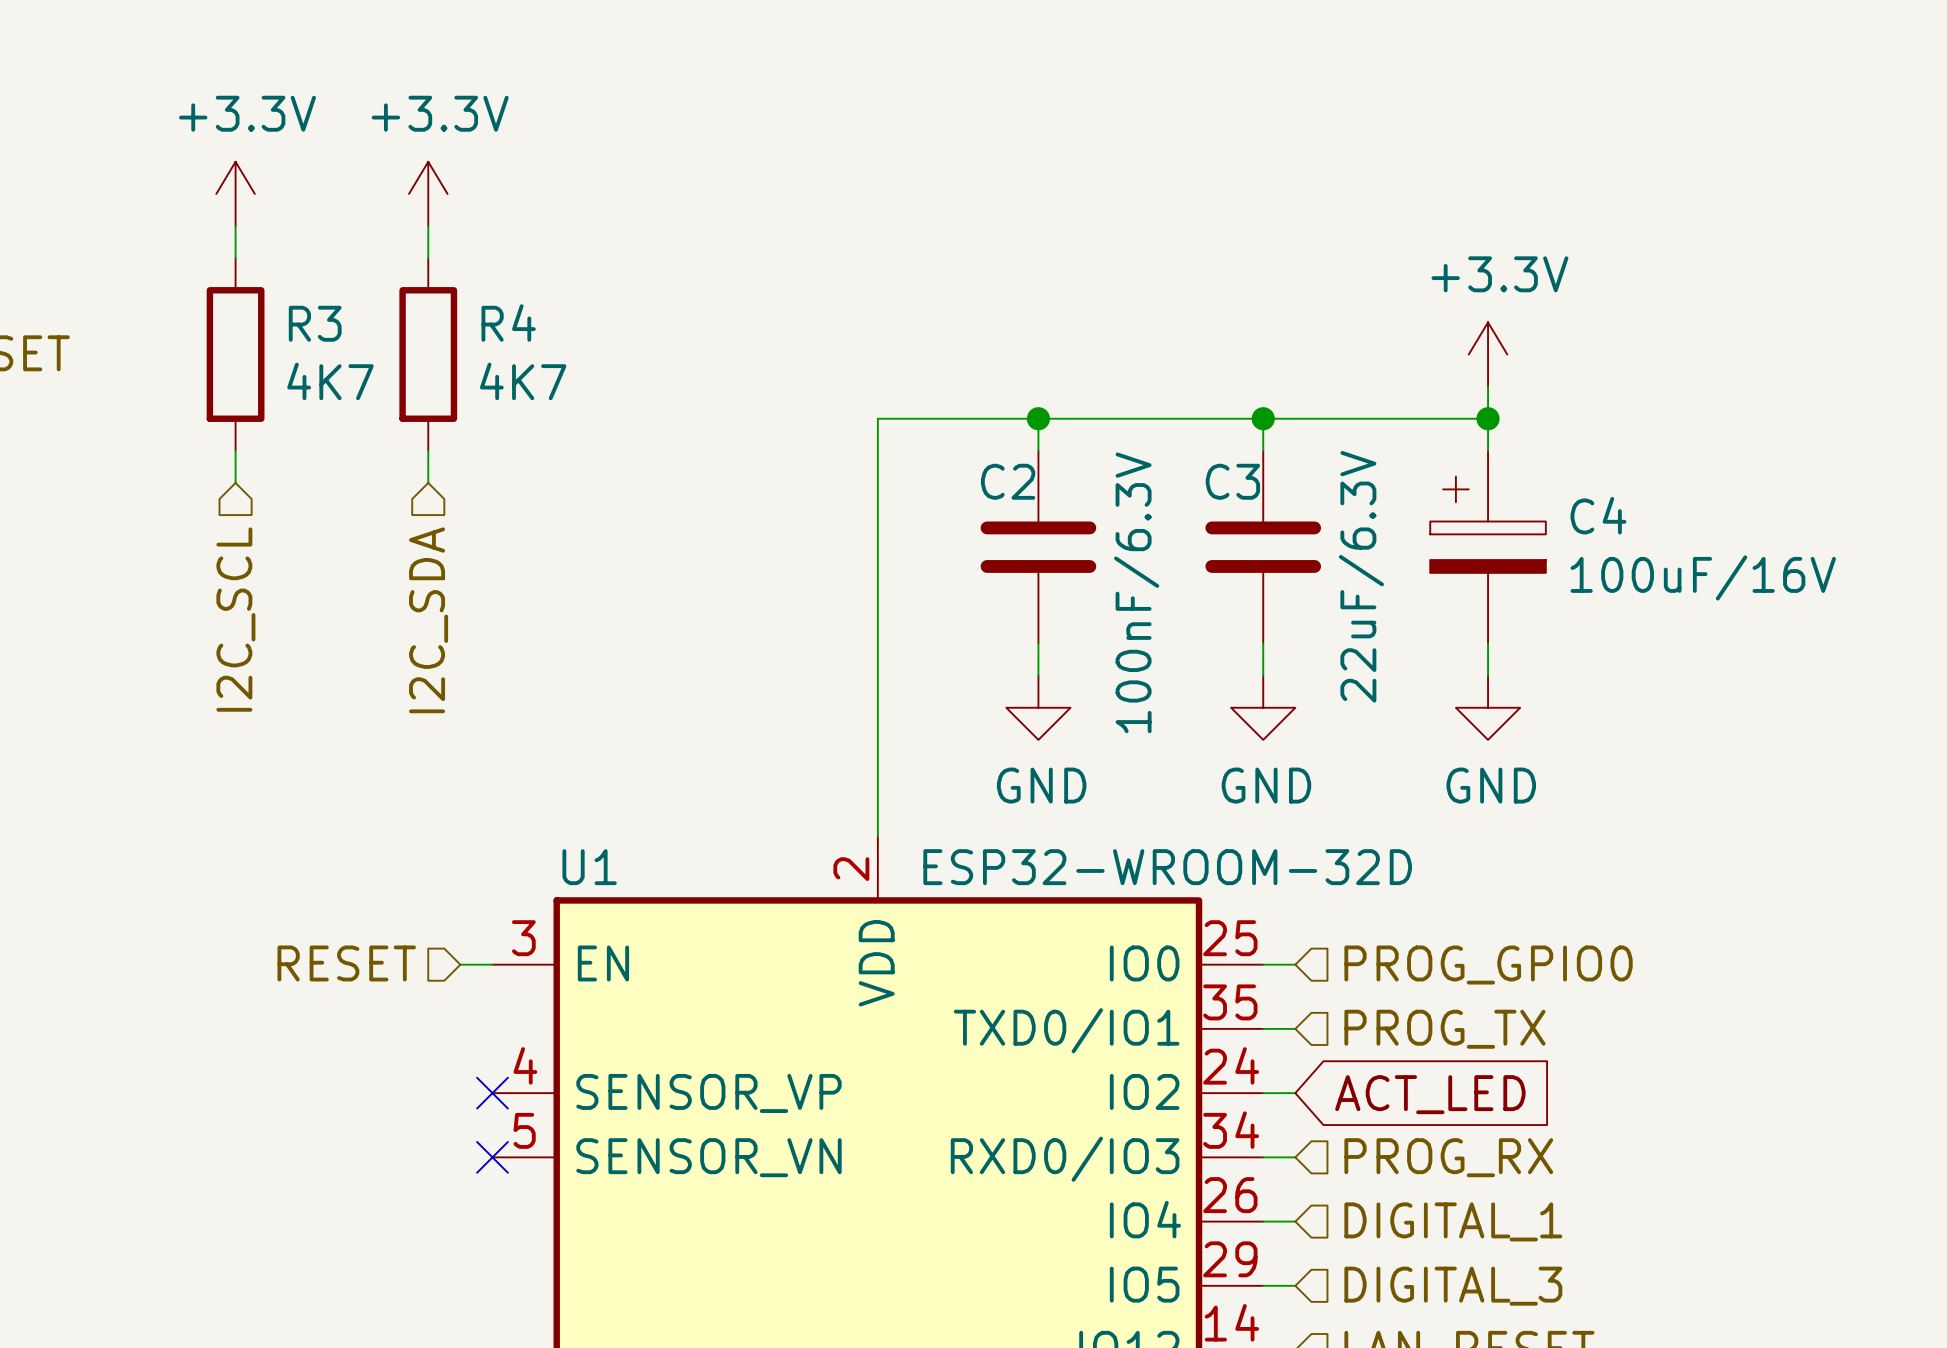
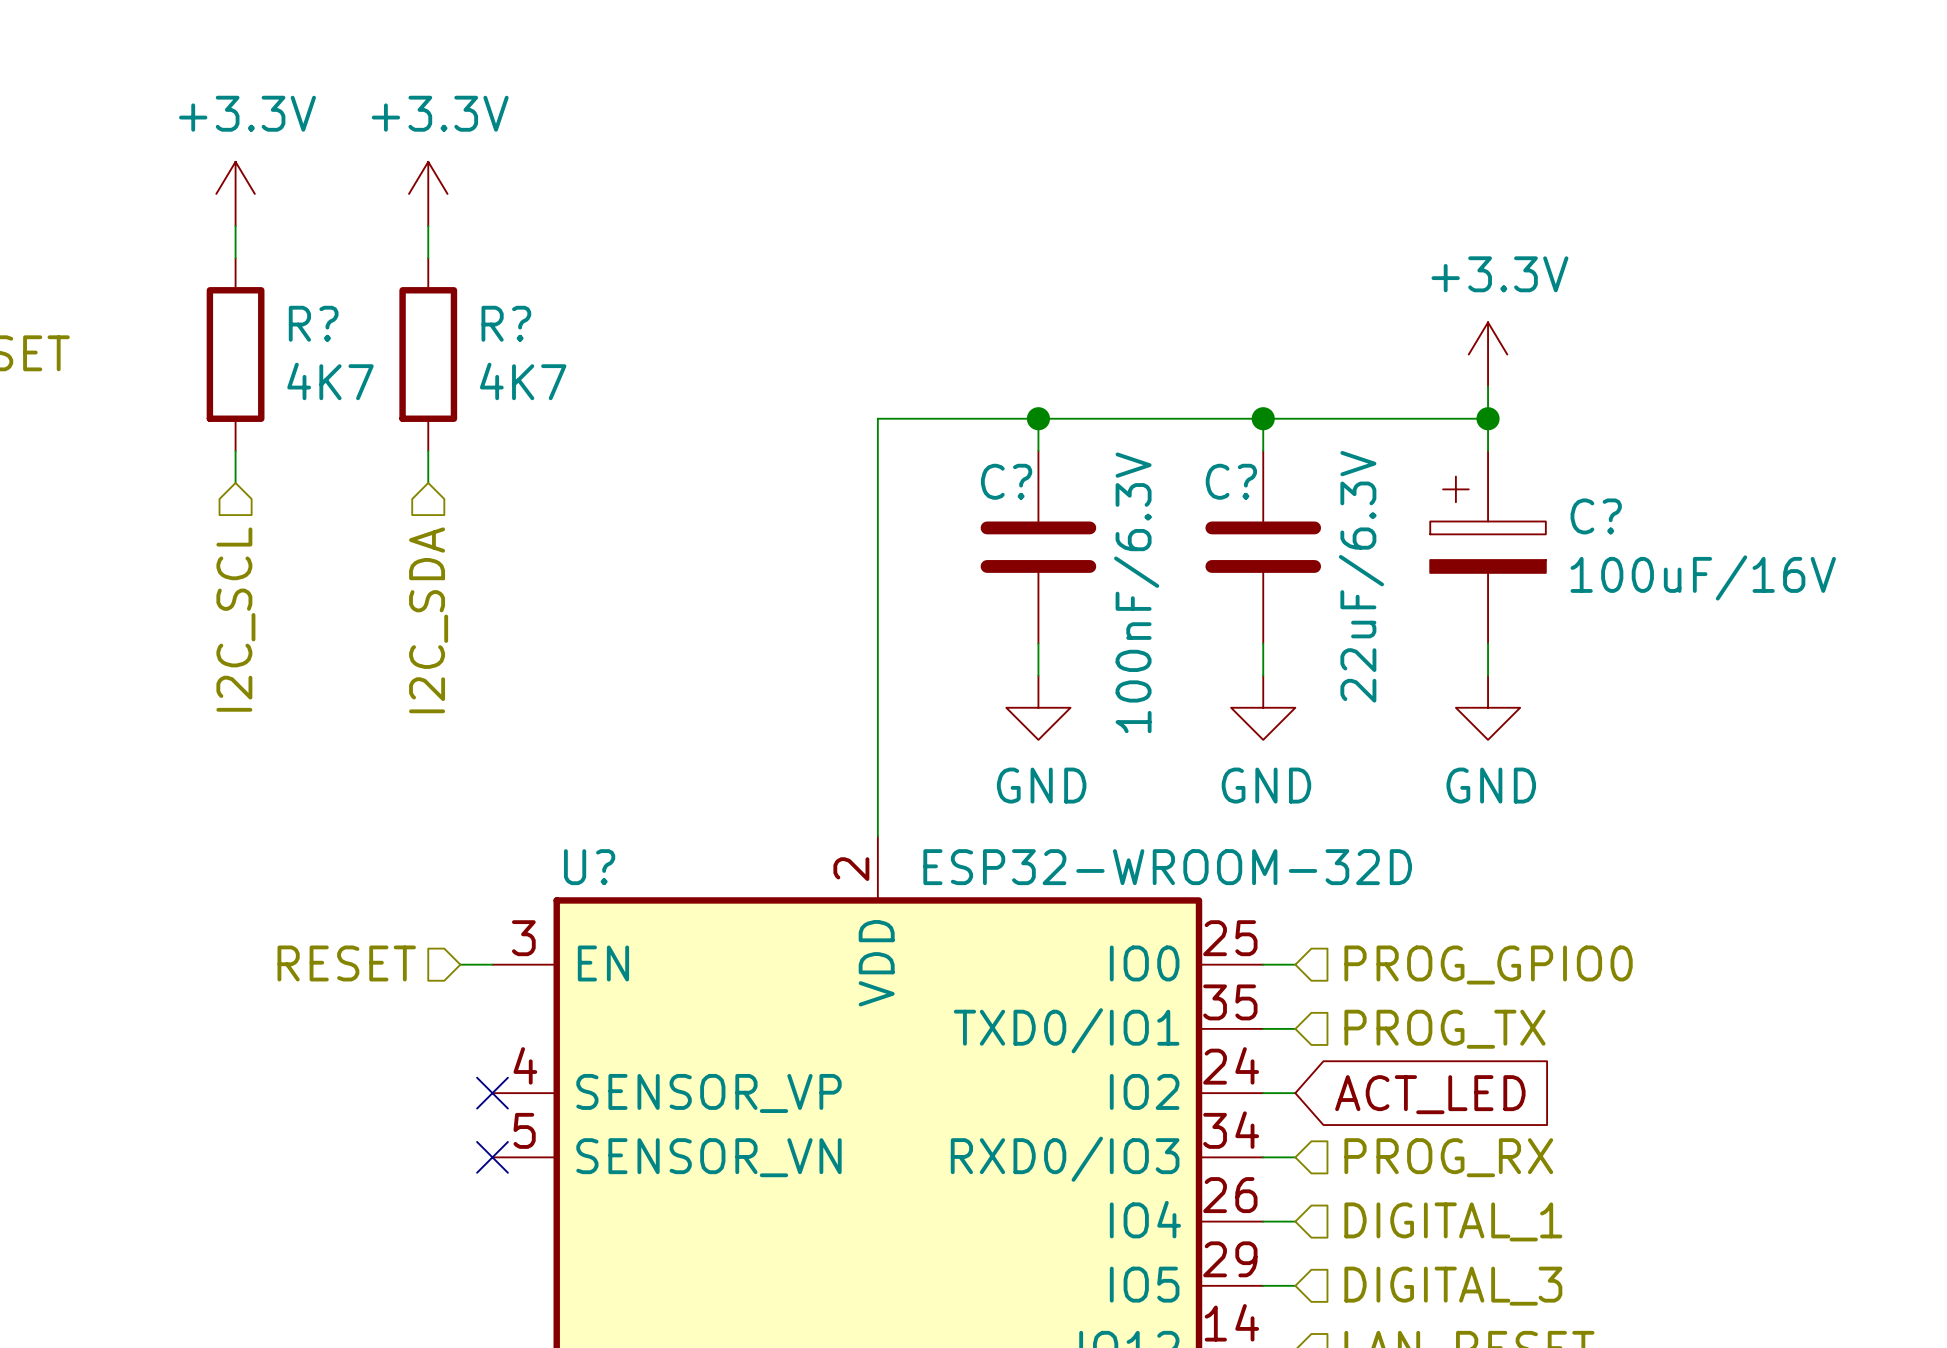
R3 name: R3 (315, 323) -> R? (313, 323)
R4 name: R4 (508, 323) -> R? (506, 323)
C2 name: C2 (1008, 481) -> C? (1006, 481)
C3 name: C3 (1232, 481) -> C? (1231, 481)
C4 name: C4 (1598, 515) -> C? (1596, 516)
U1 name: U1 (589, 867) -> U? (589, 867)

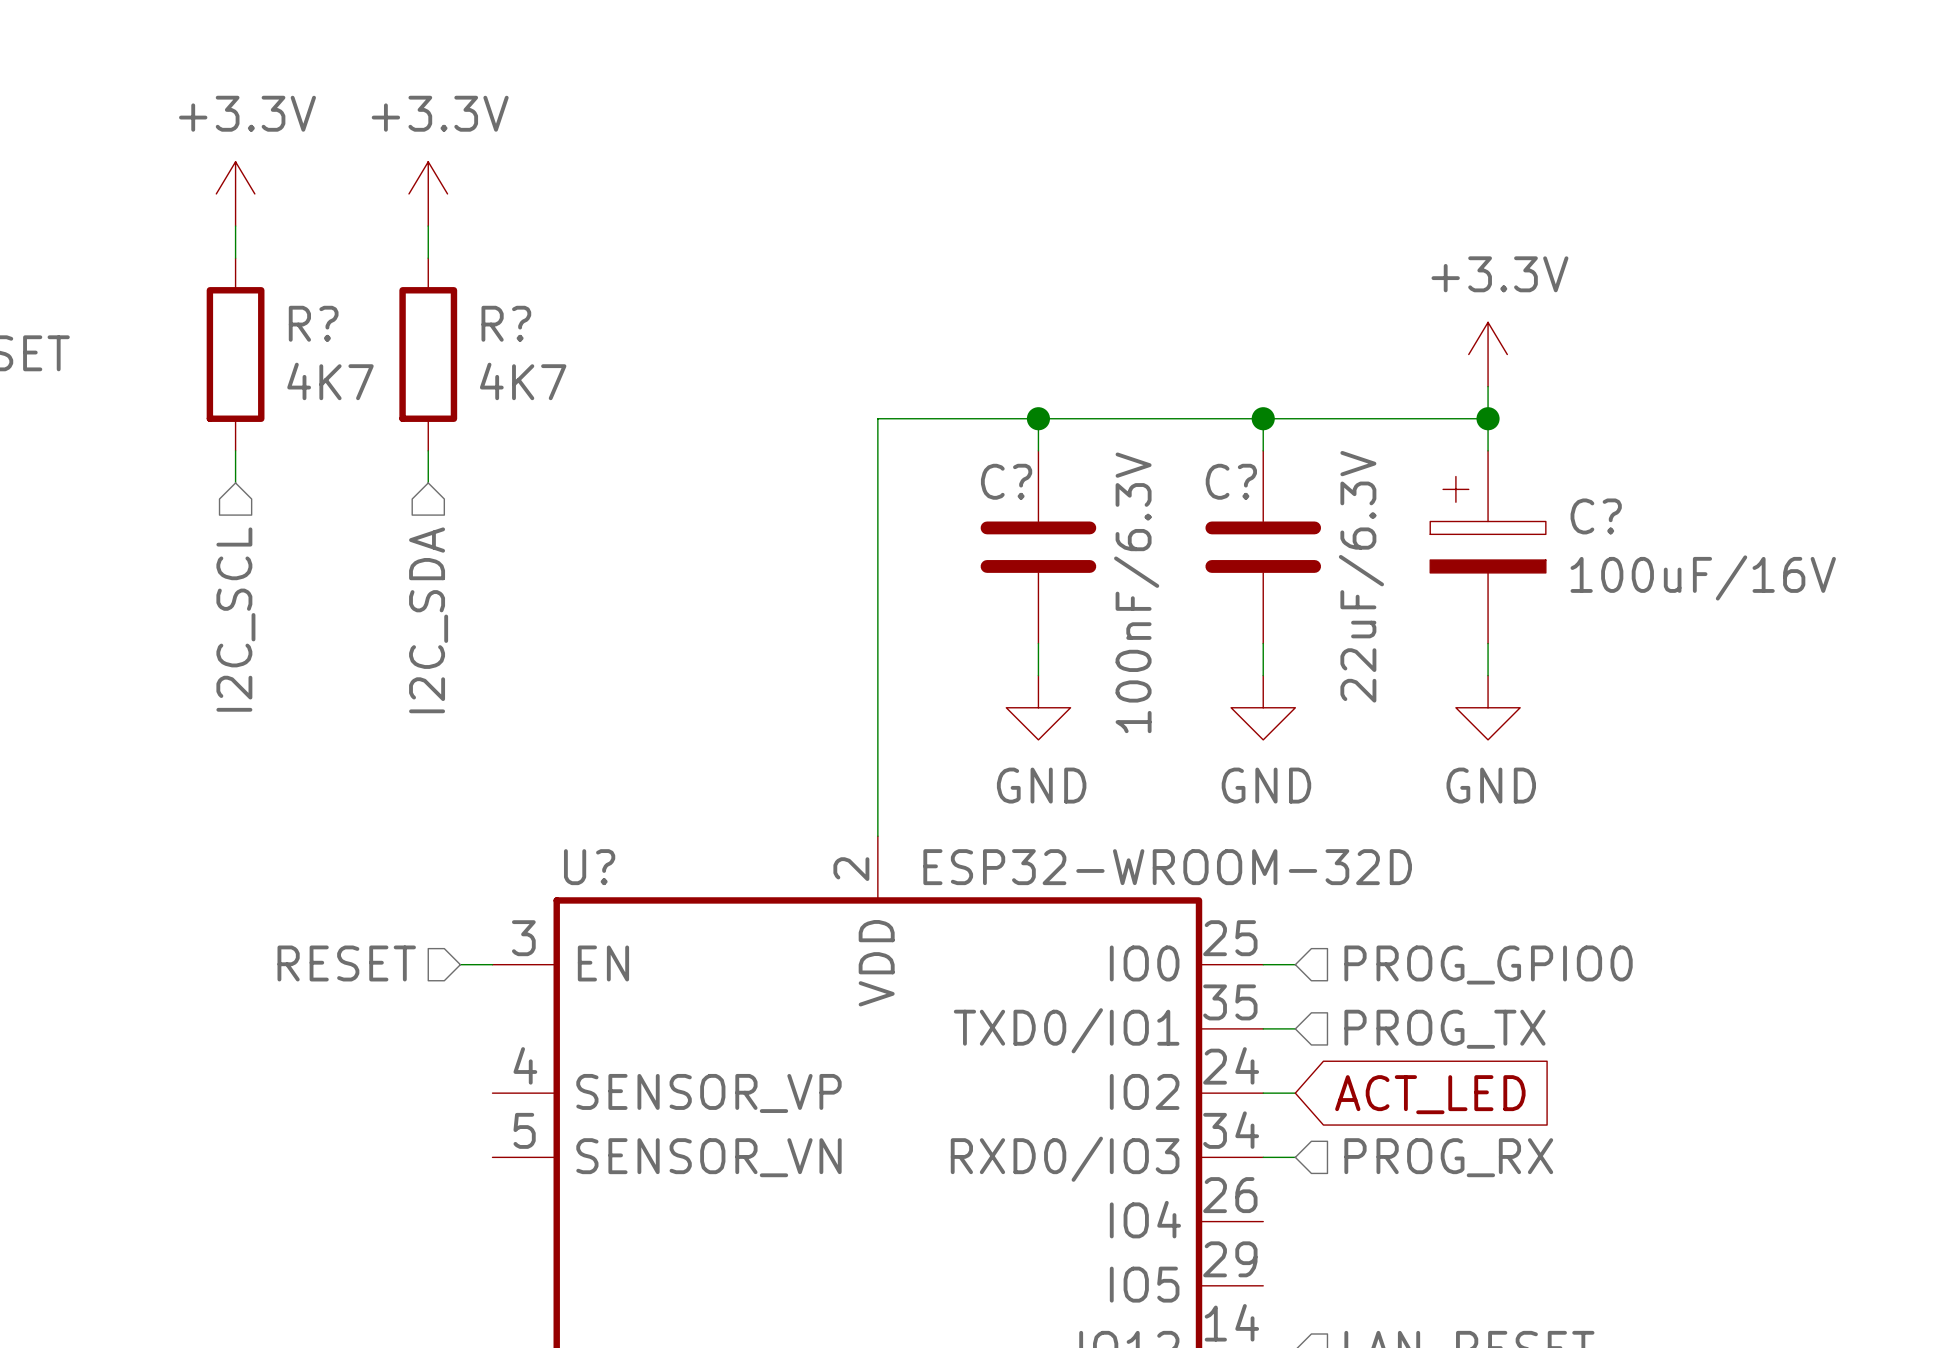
no-connect mark: (492, 1093) -> none
no-connect mark: (492, 1157) -> none
wire: (1263, 1221) (1295, 1221) -> none
hierarchical label: DIGITAL_1 (1453, 1221) -> none
wire: (1263, 1285) (1295, 1285) -> none
hierarchical label: DIGITAL_3 (1453, 1286) -> none

